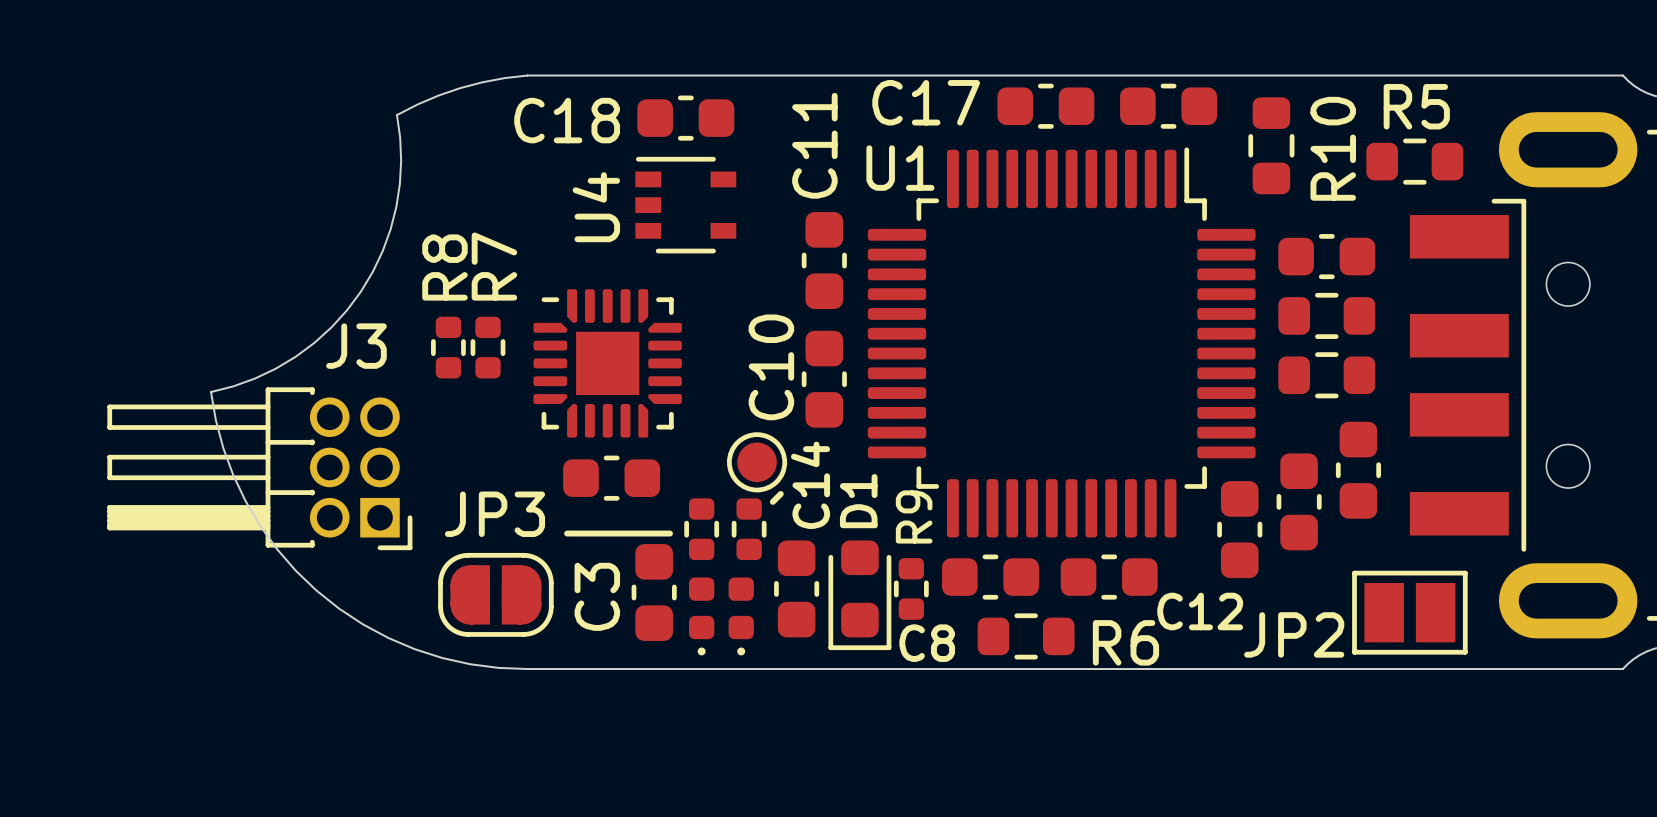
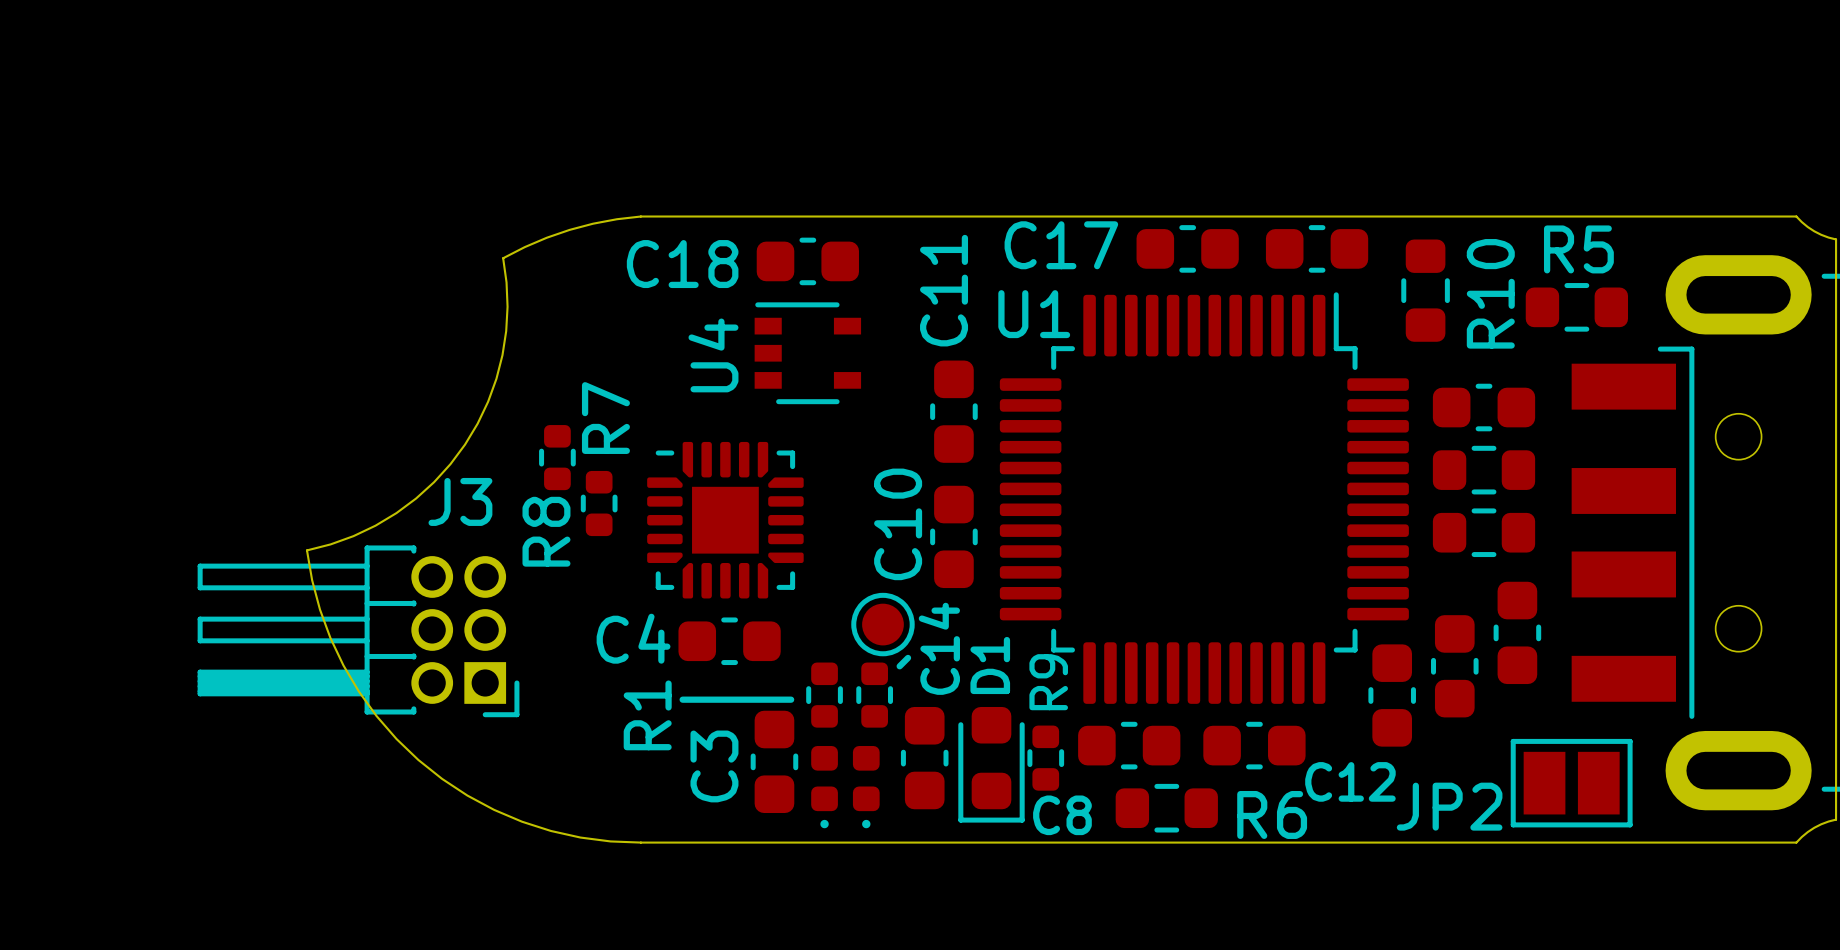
R8 name position: R8 (444, 267) -> R8 (546, 531)
R8 position: (448, 347) -> (557, 457)
C4 name: none -> C4 (633, 638)
R1 name: none -> R1 (647, 715)
JP3: (495, 594) -> none

